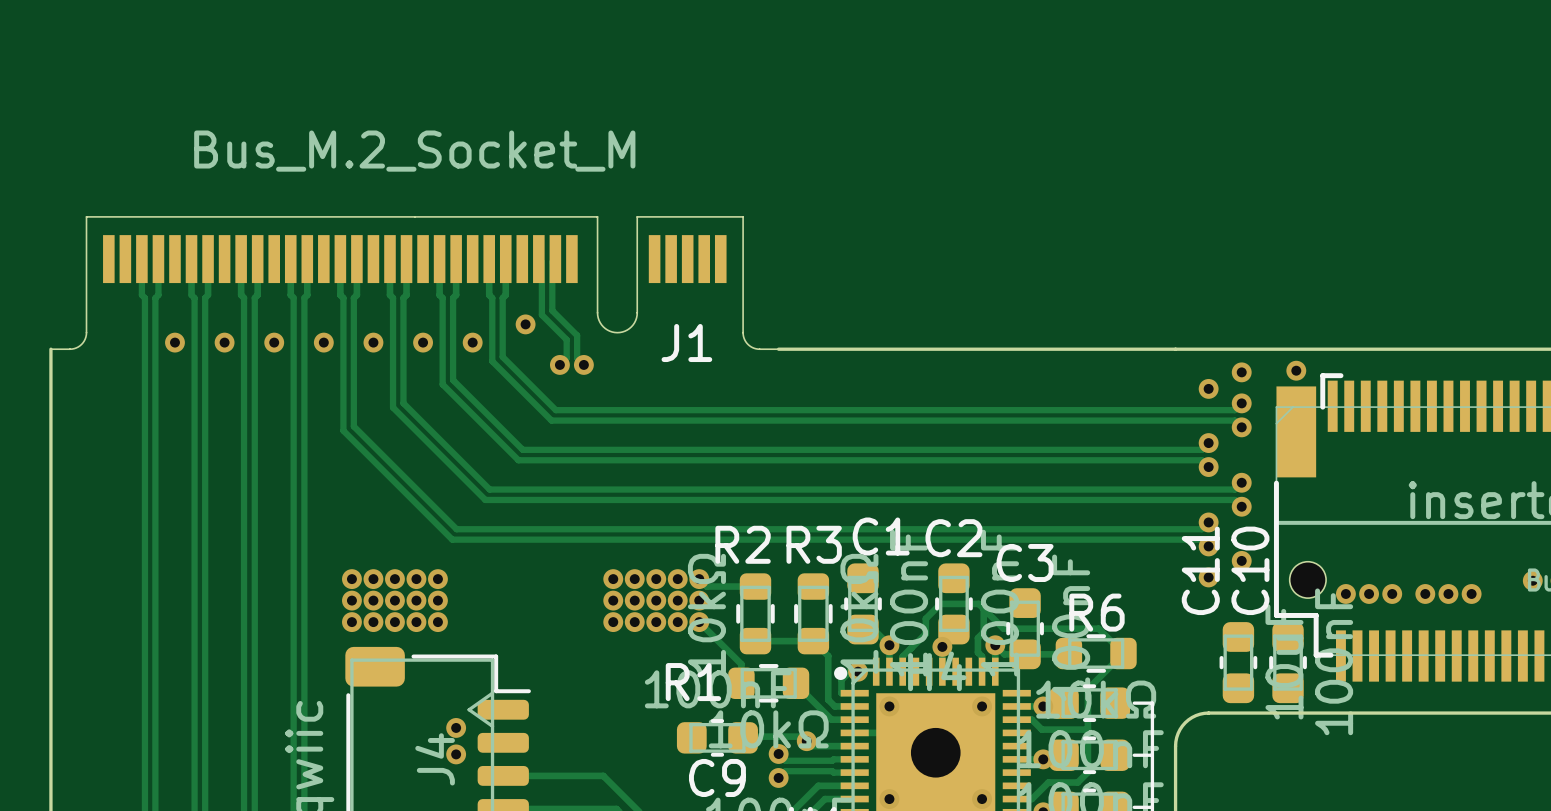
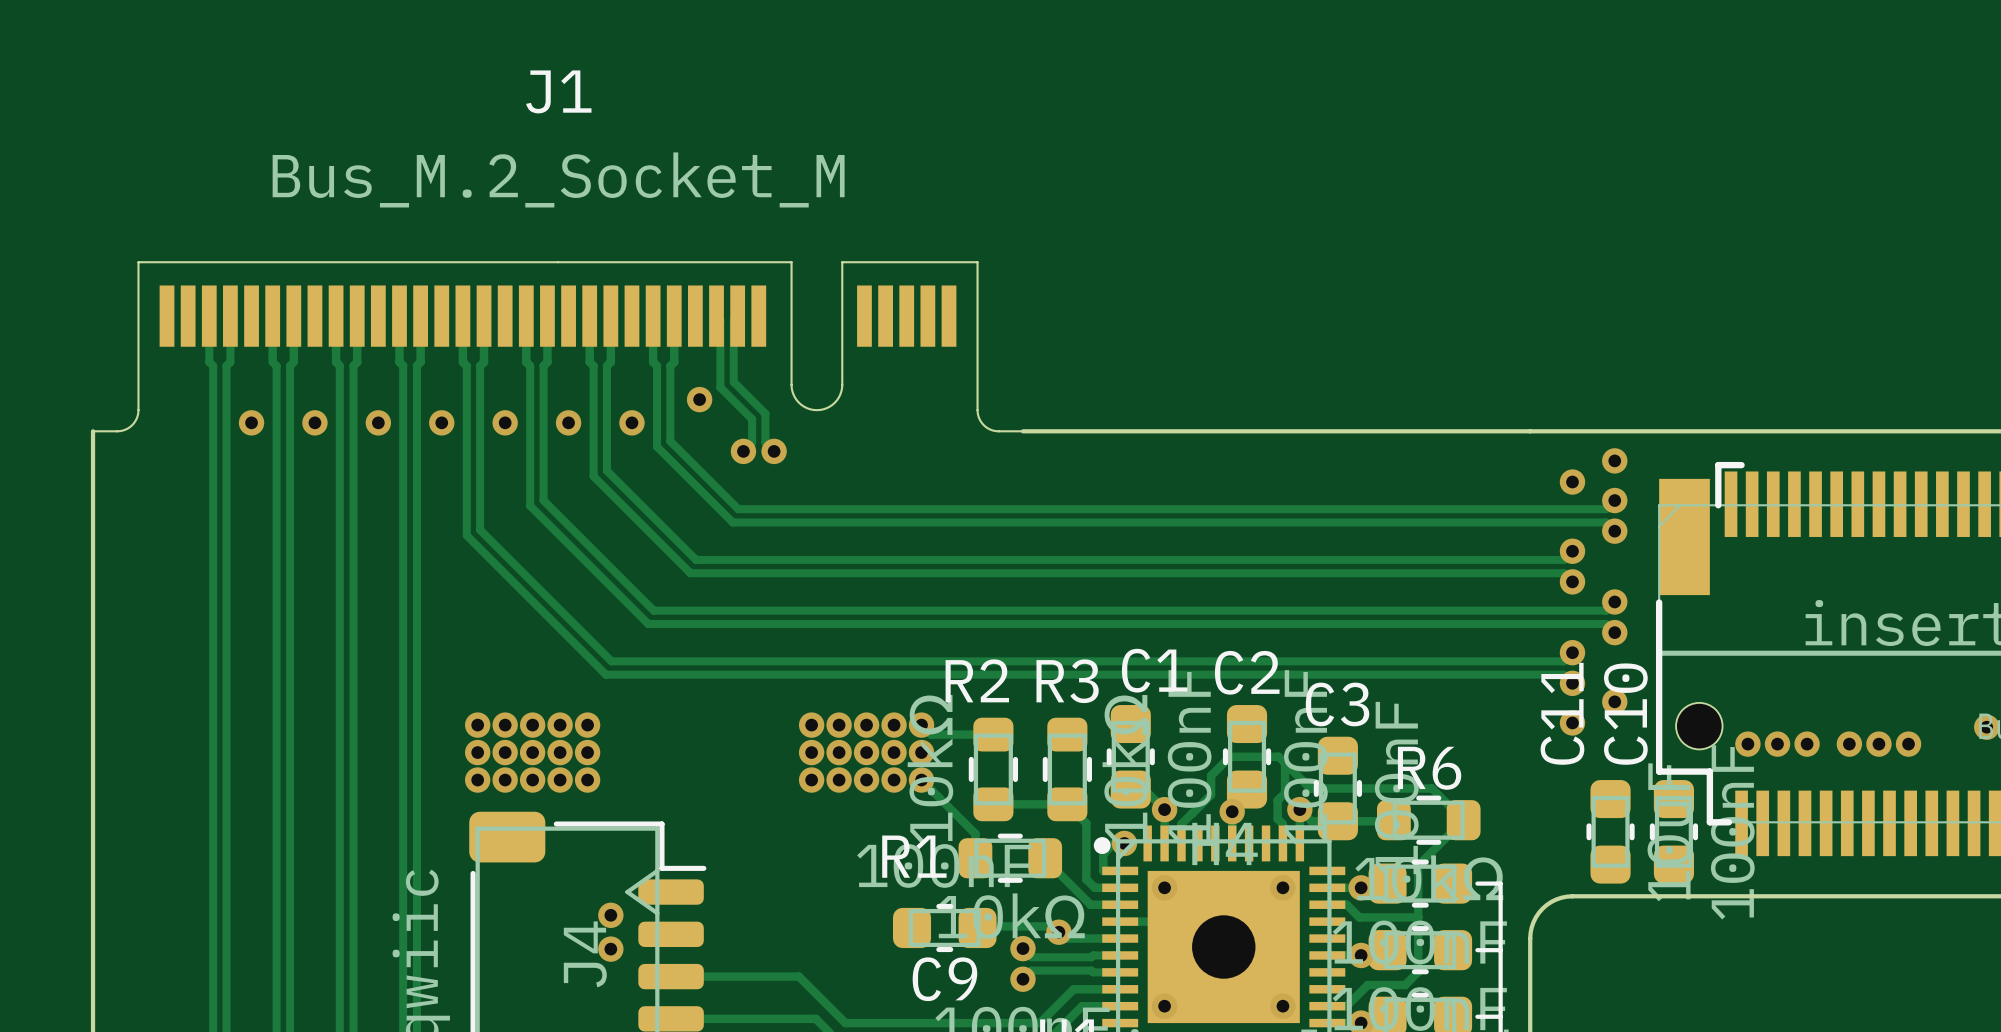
J1 name position: J1 (686, 343) -> J1 (558, 91)
via: (1296, 370) -> none

